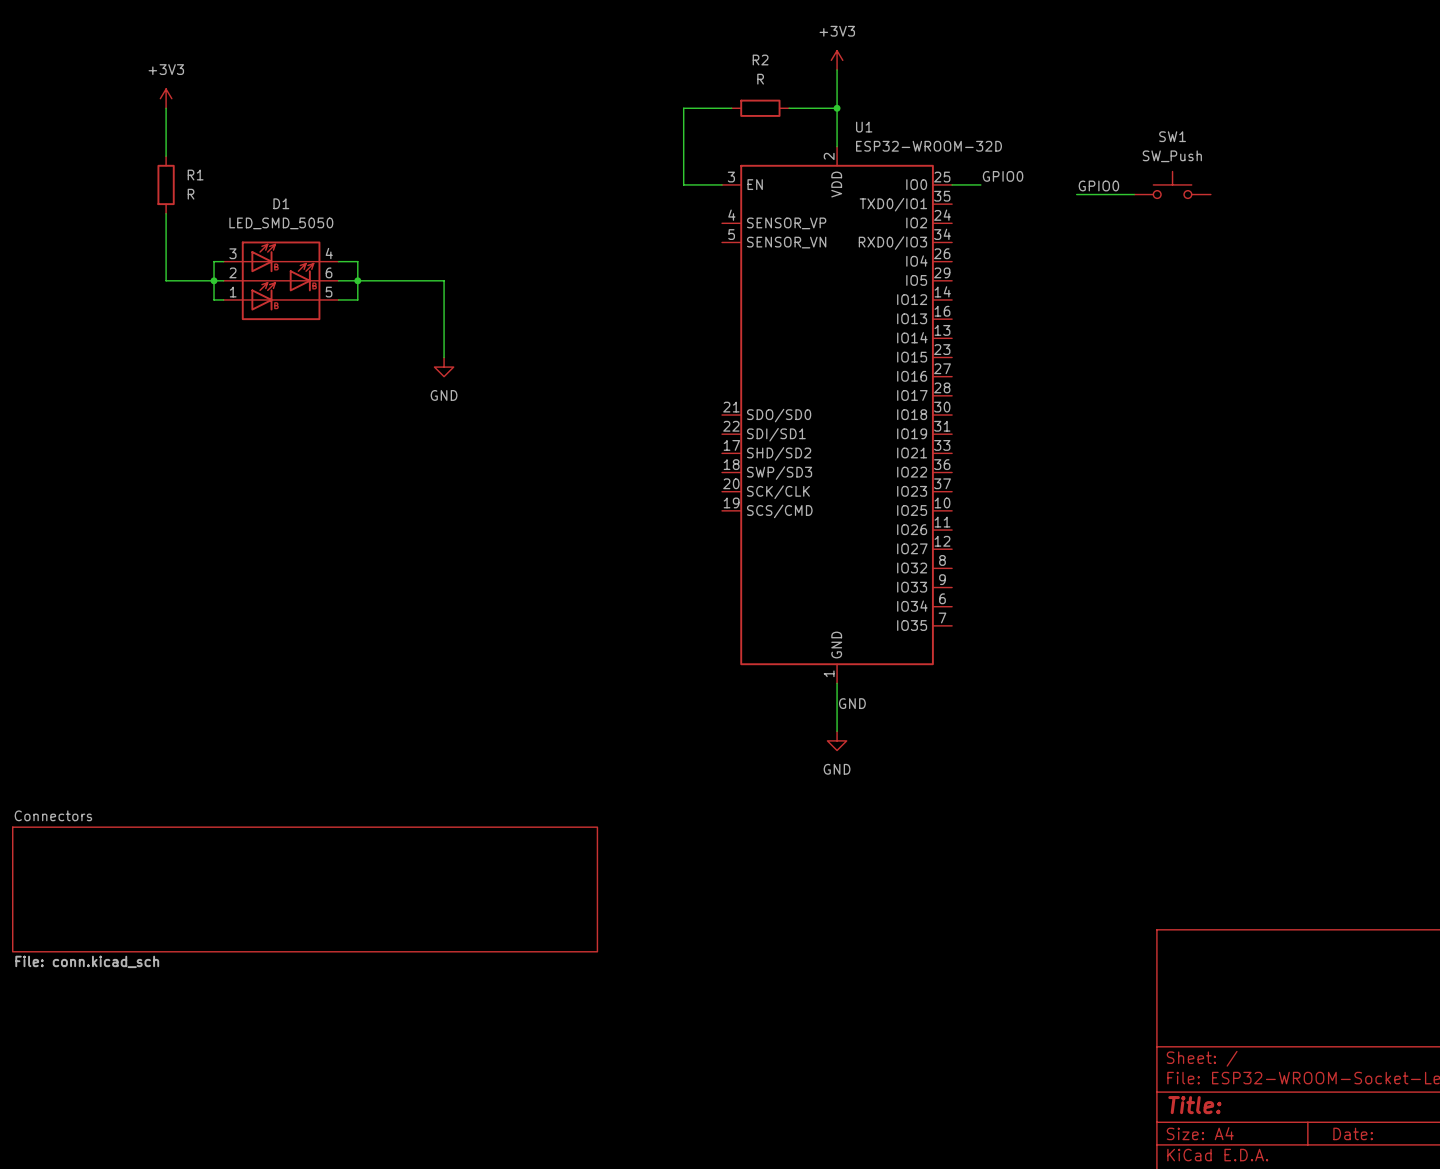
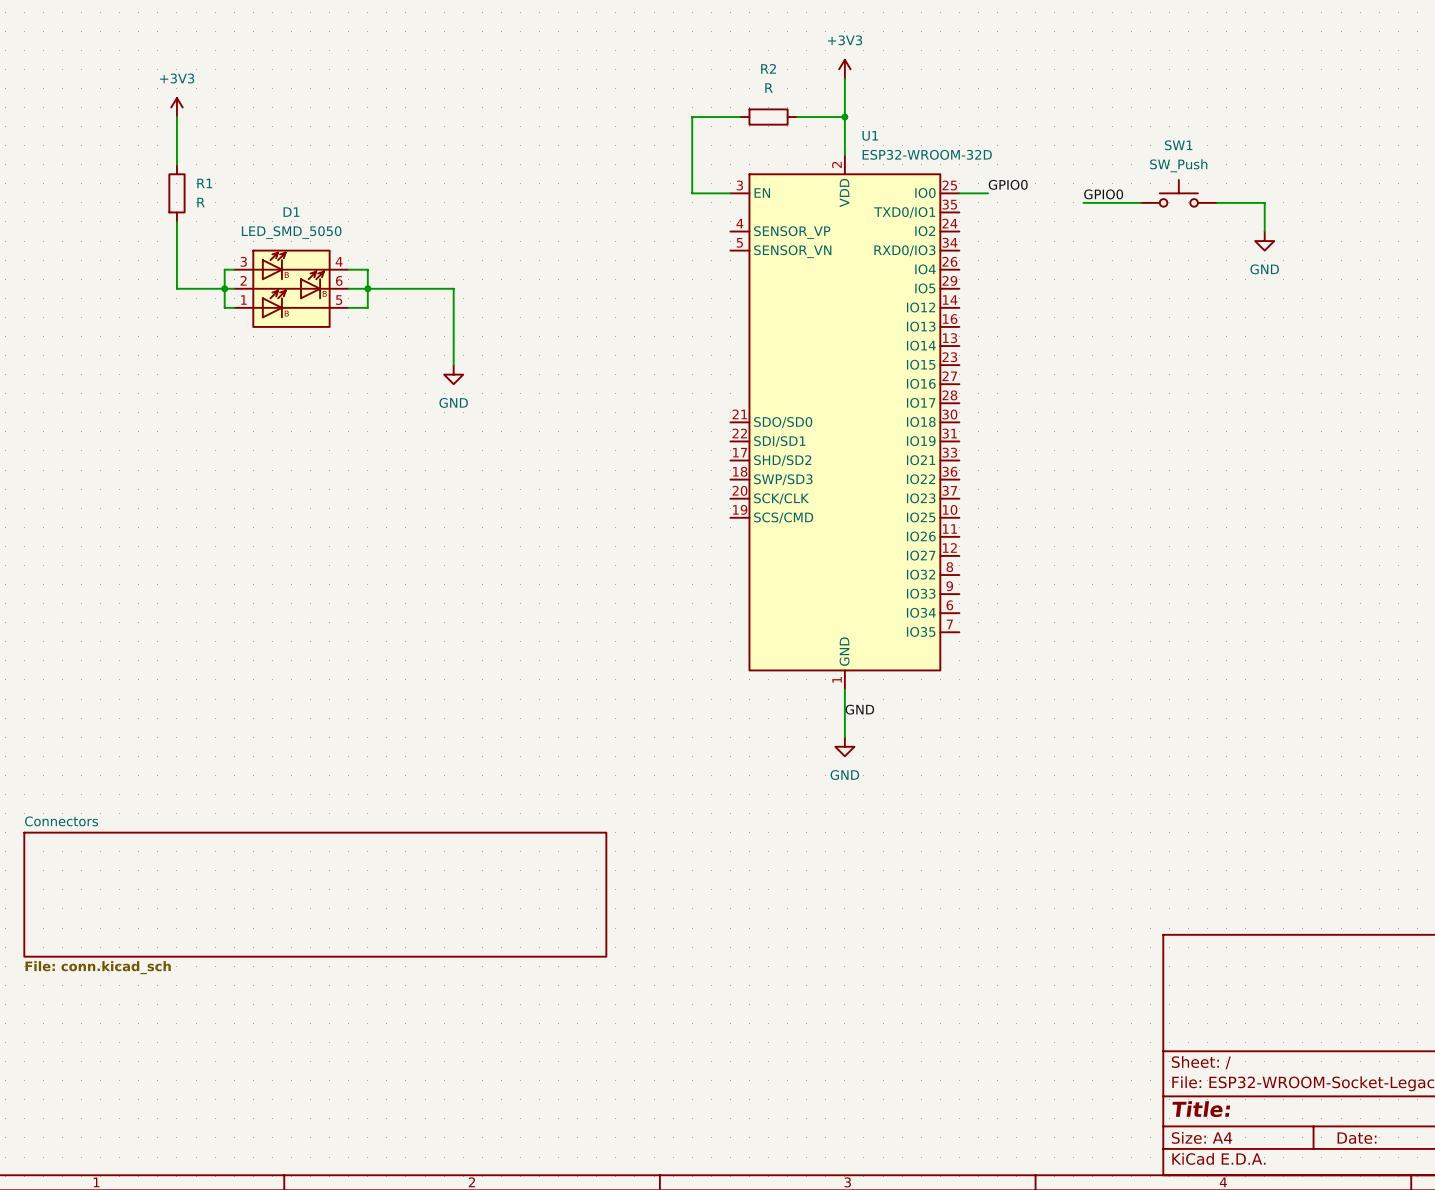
wire: none -> (1217, 202) (1264, 202) (1264, 231)
power symbol: none -> GND (1264, 241)

